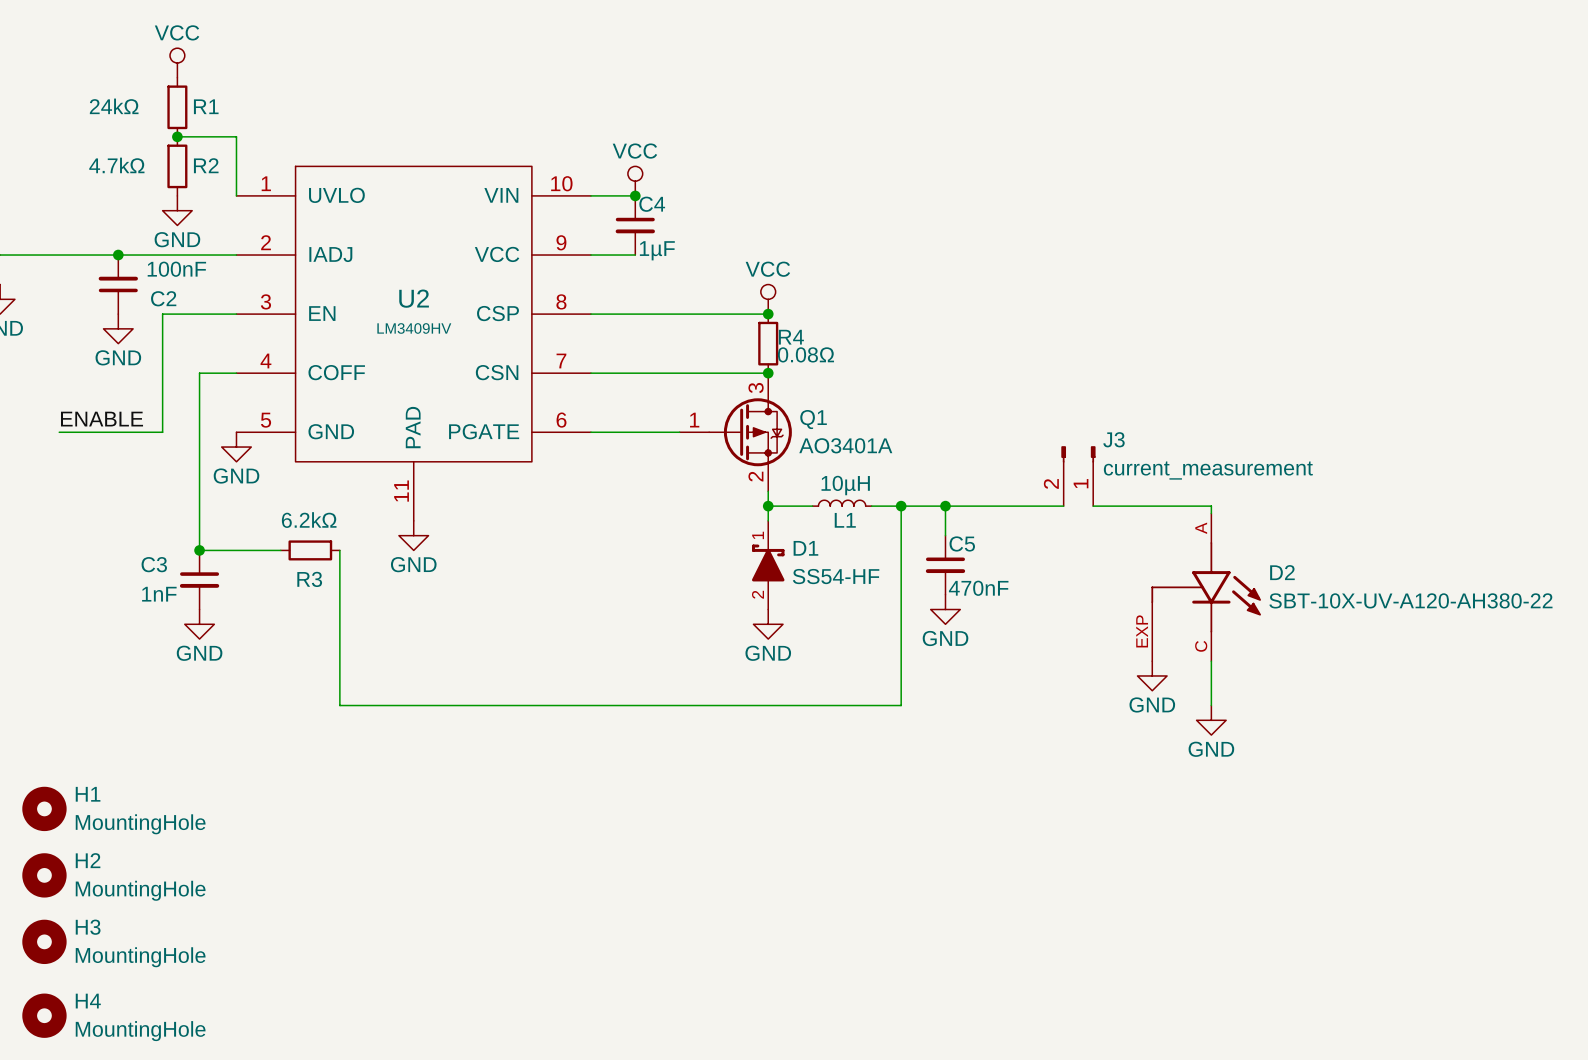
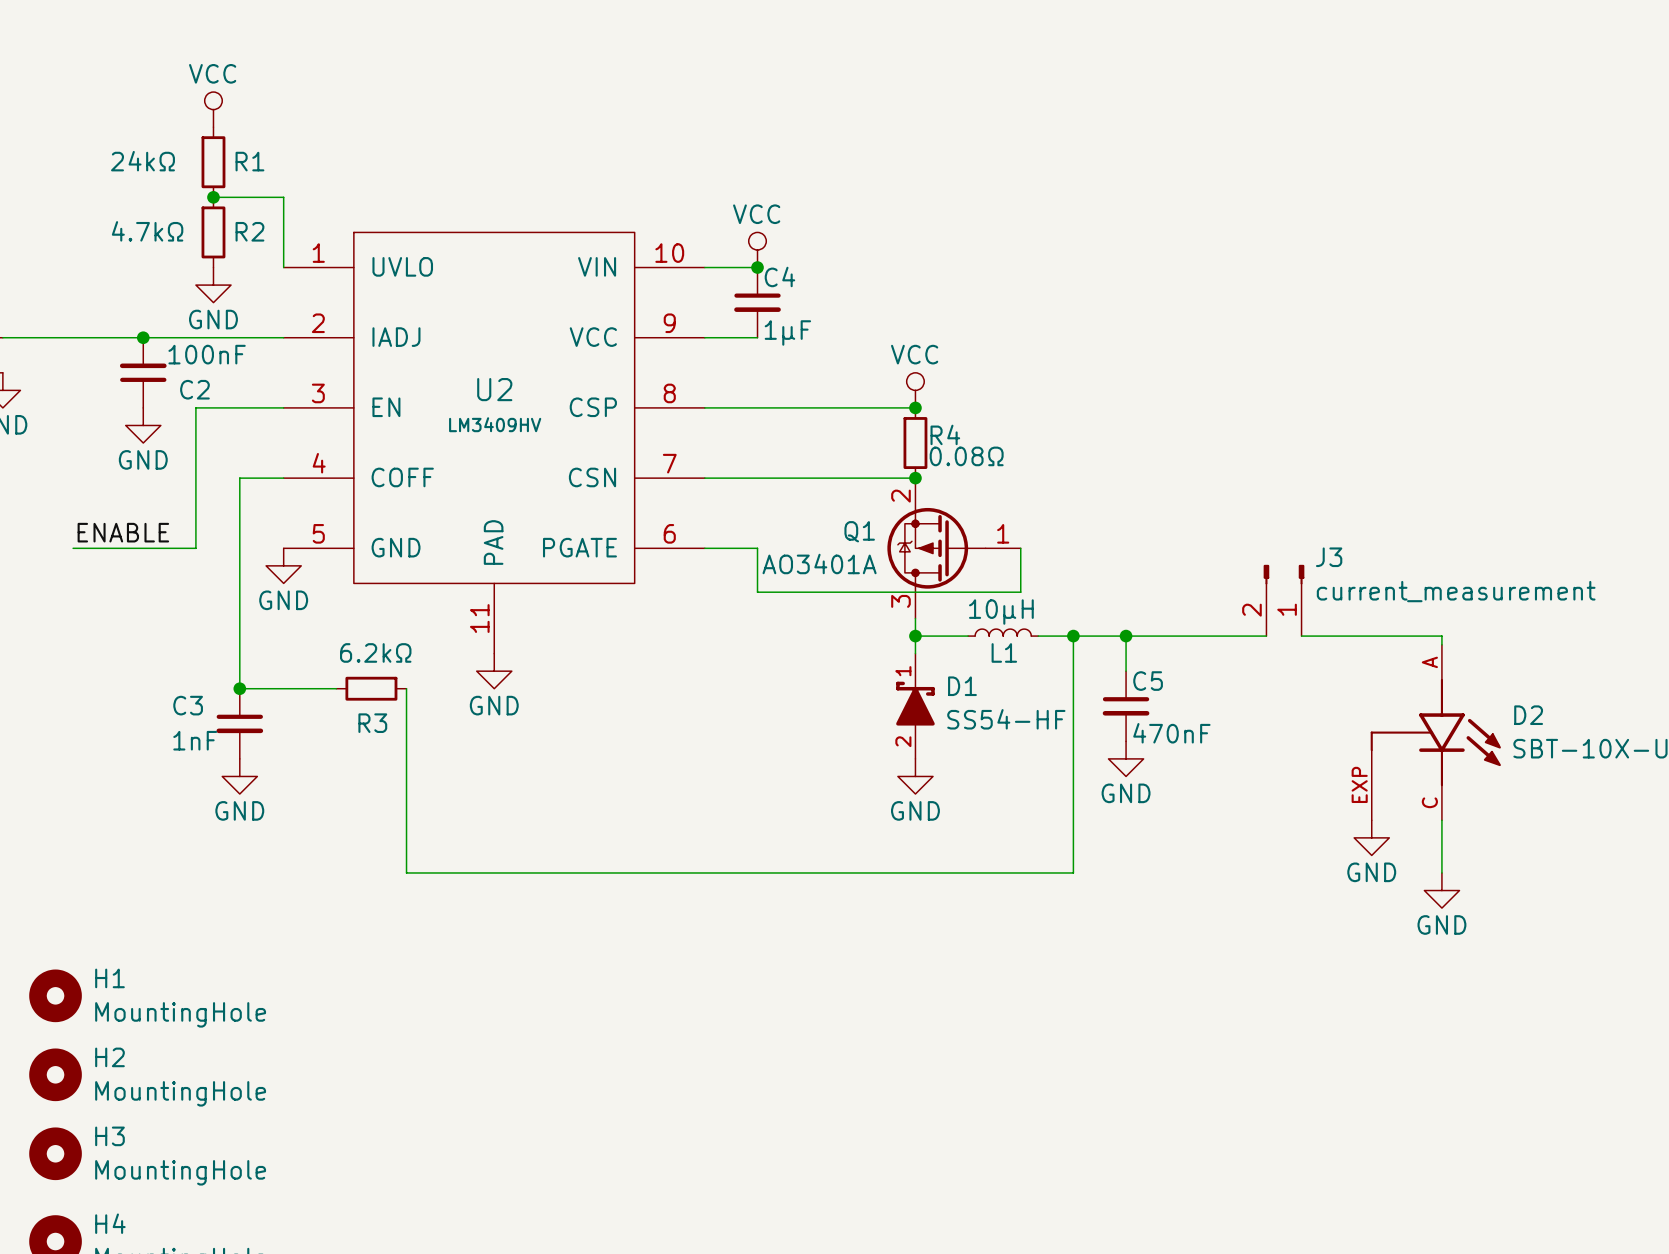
Q1 name position: Q1 (813, 419) -> Q1 (859, 531)
wire: (635, 432) (679, 432) -> (757, 548) (757, 592) (1020, 592) (1020, 548)
Q1 rotation: 0° (750, 432) -> 180° (936, 548)
Q1 value position: AO3401A (845, 445) -> AO3401A (819, 564)

